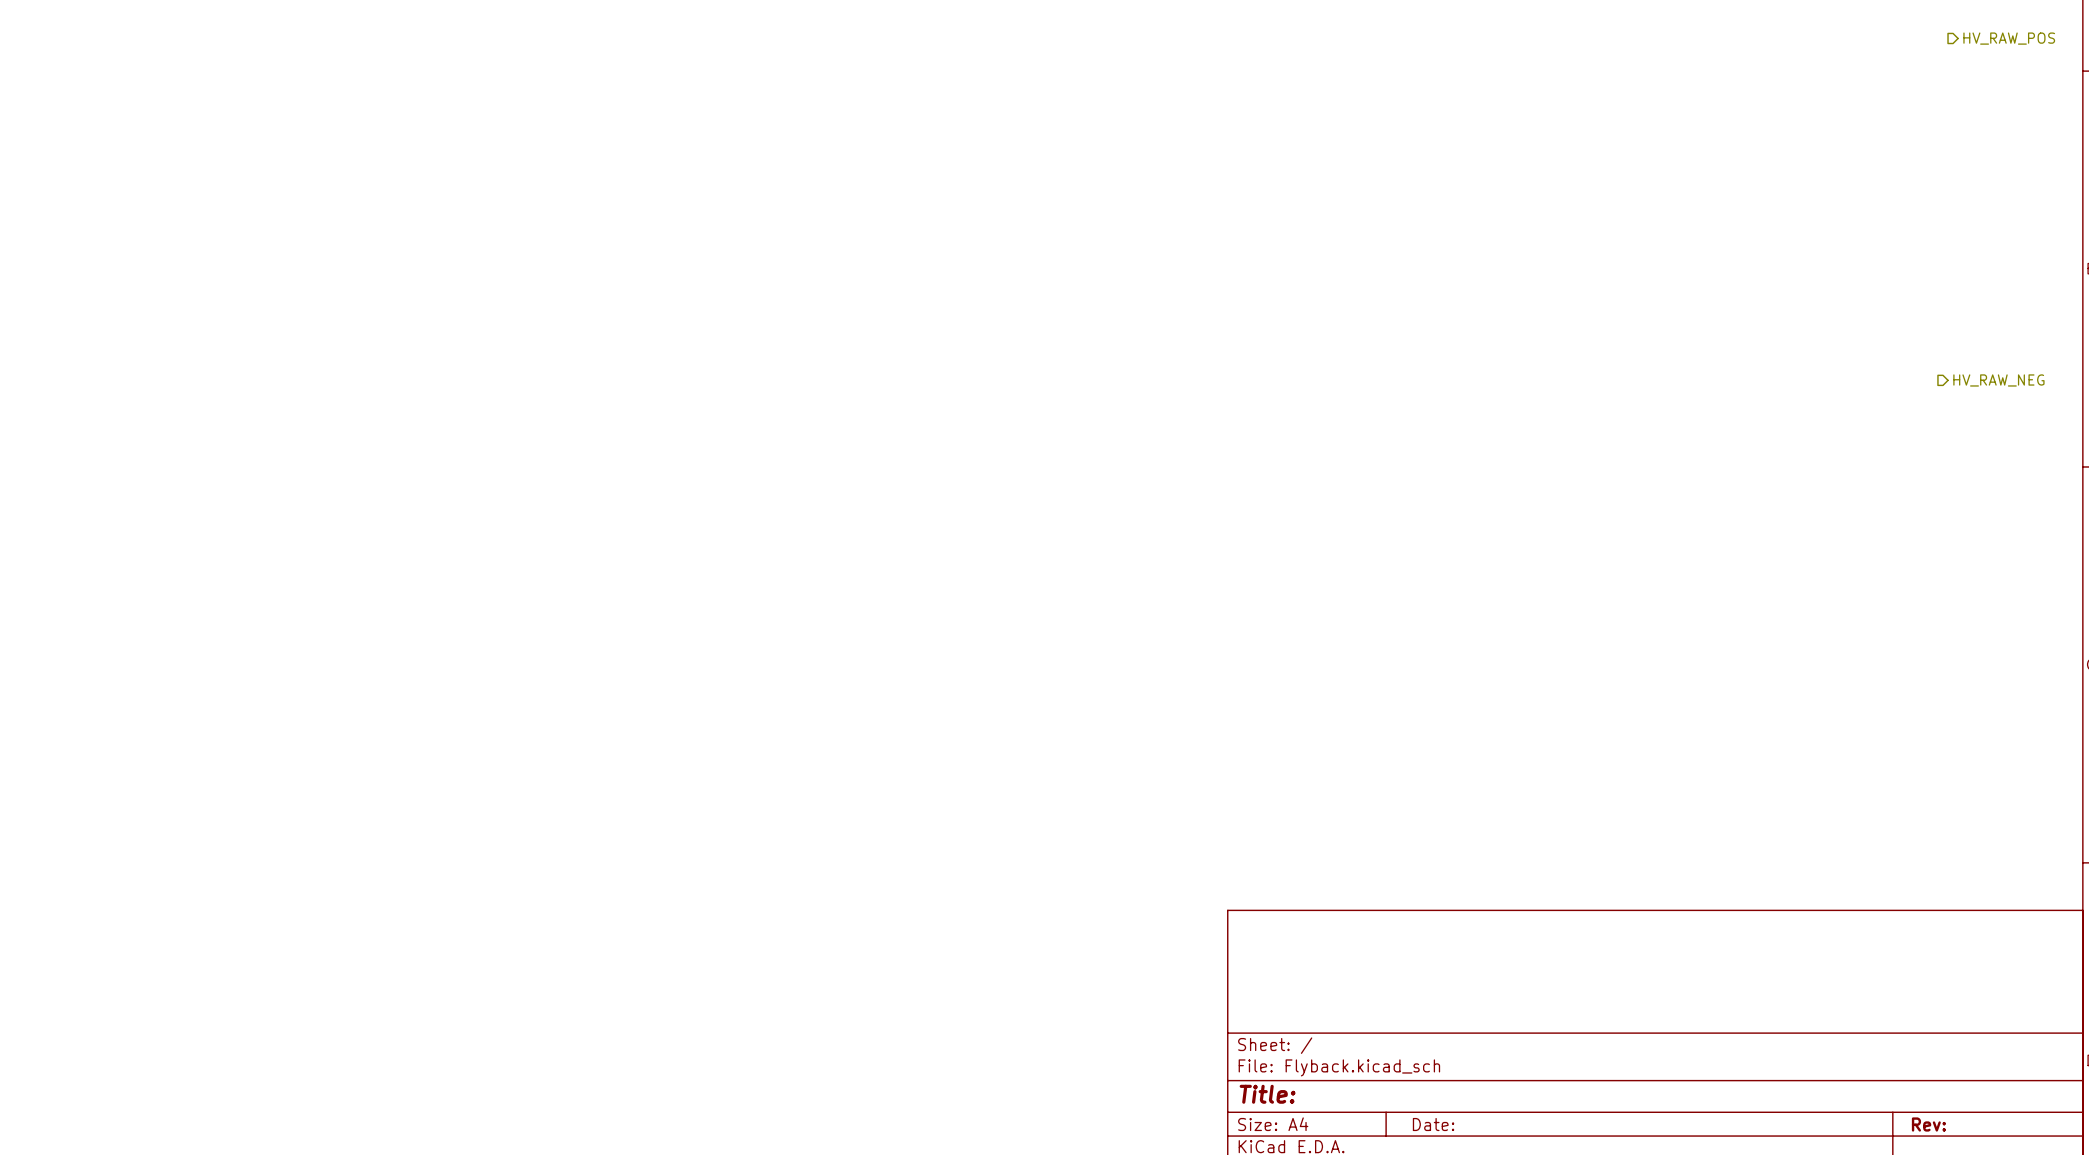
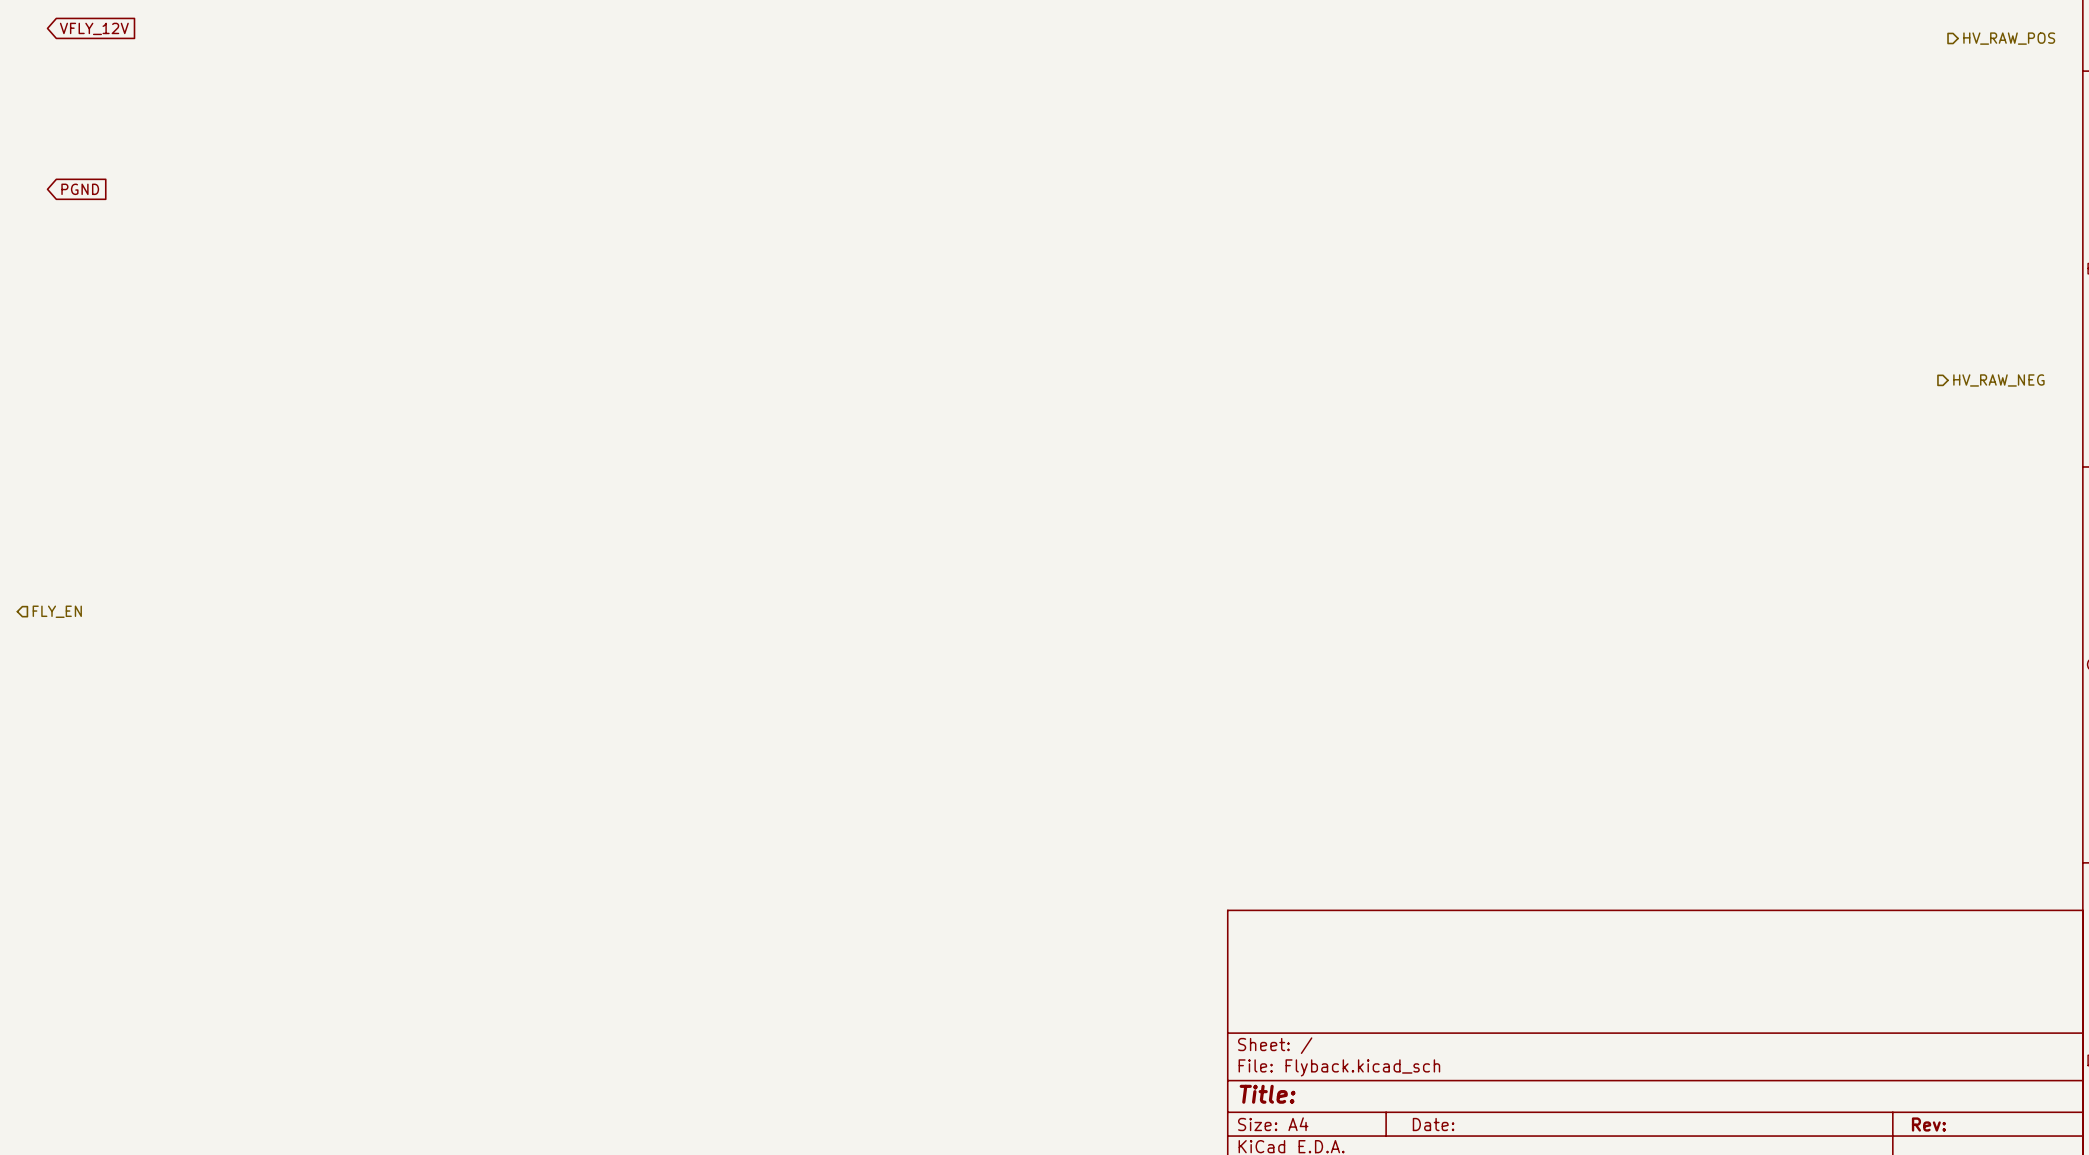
global label: none -> VFLY_12V (94, 28)
global label: none -> PGND (80, 189)
hierarchical label: none -> FLY_EN (57, 611)

